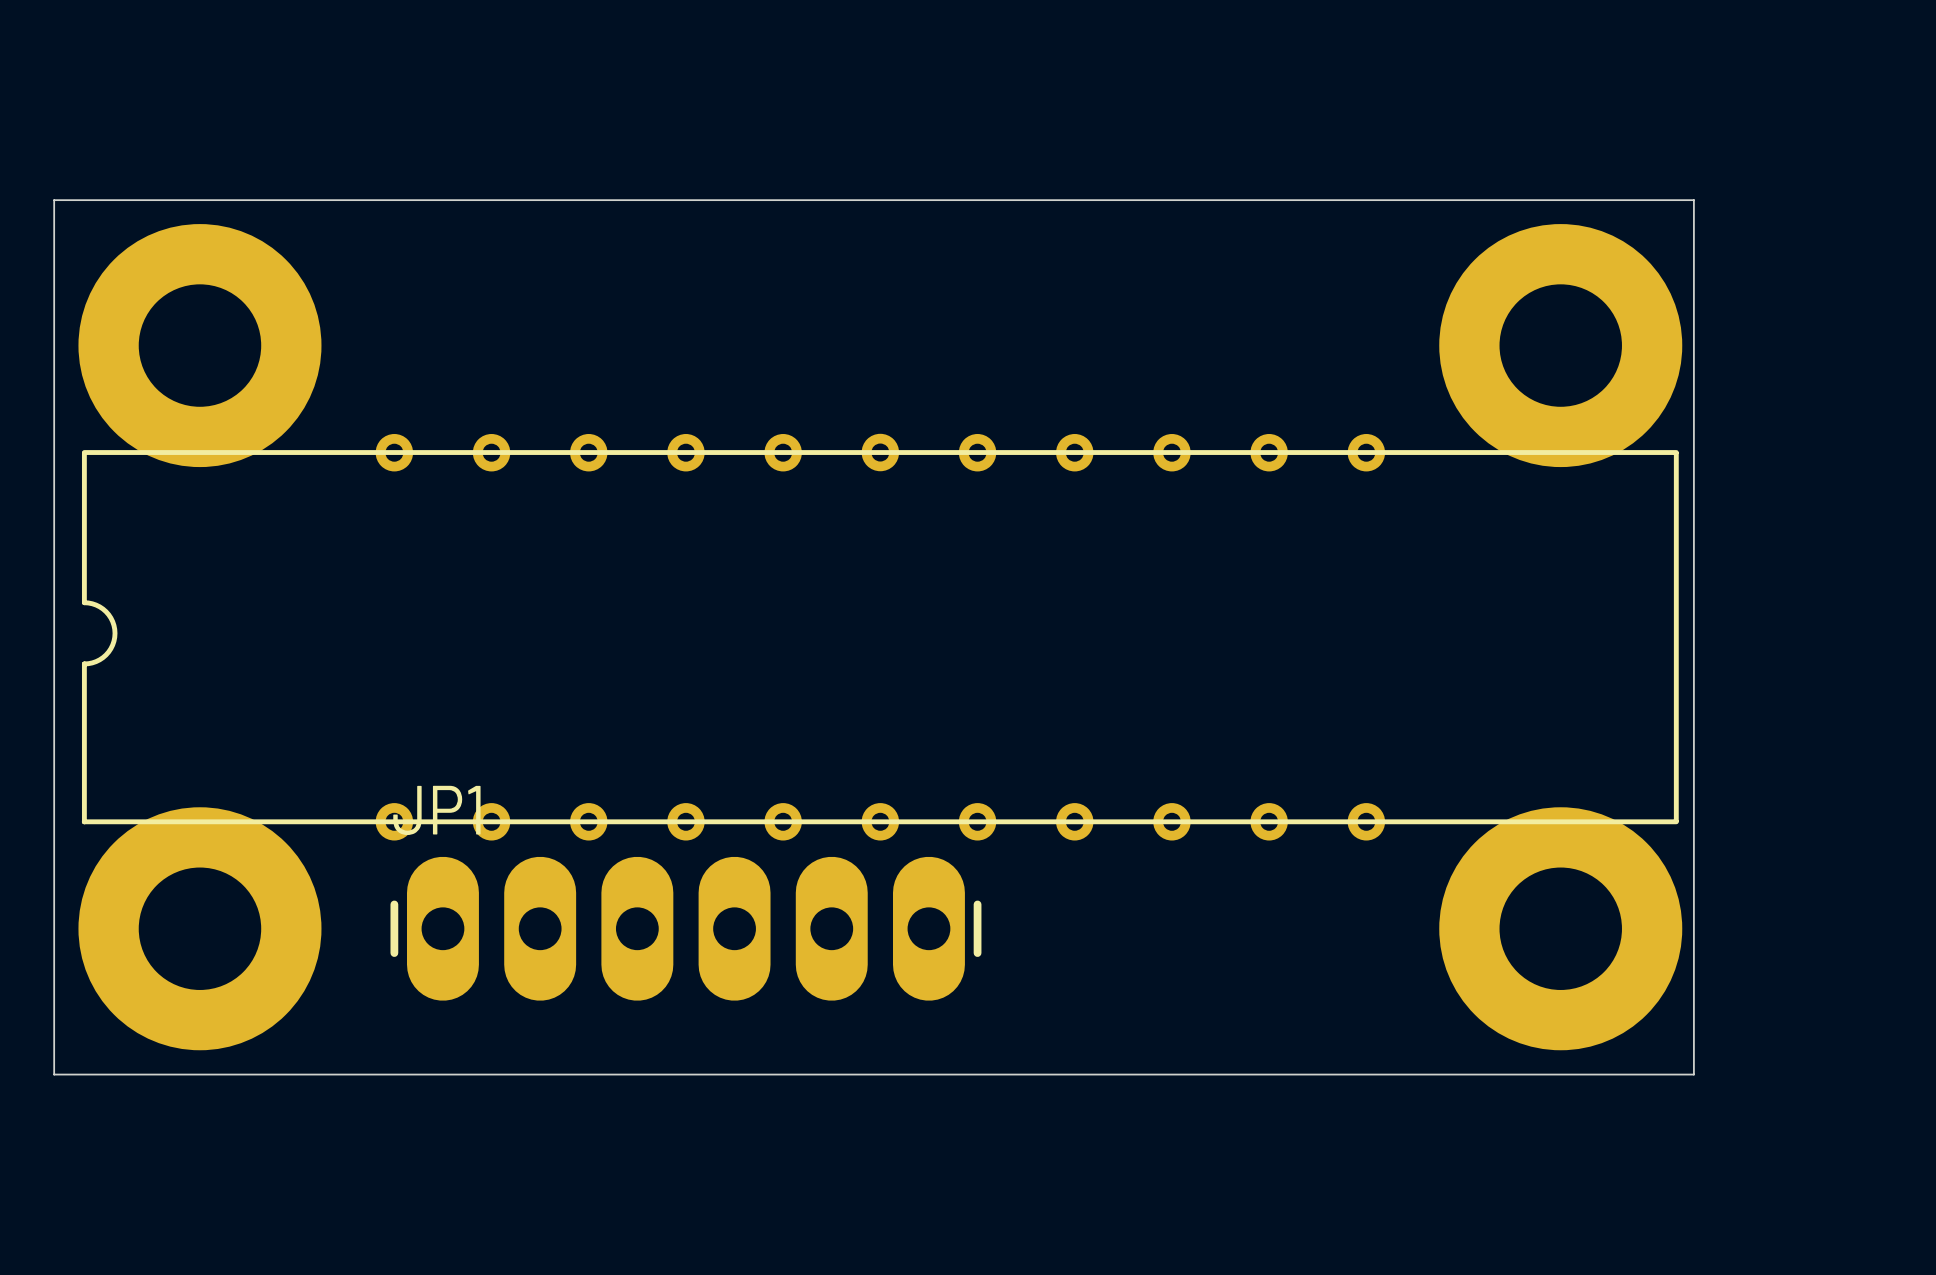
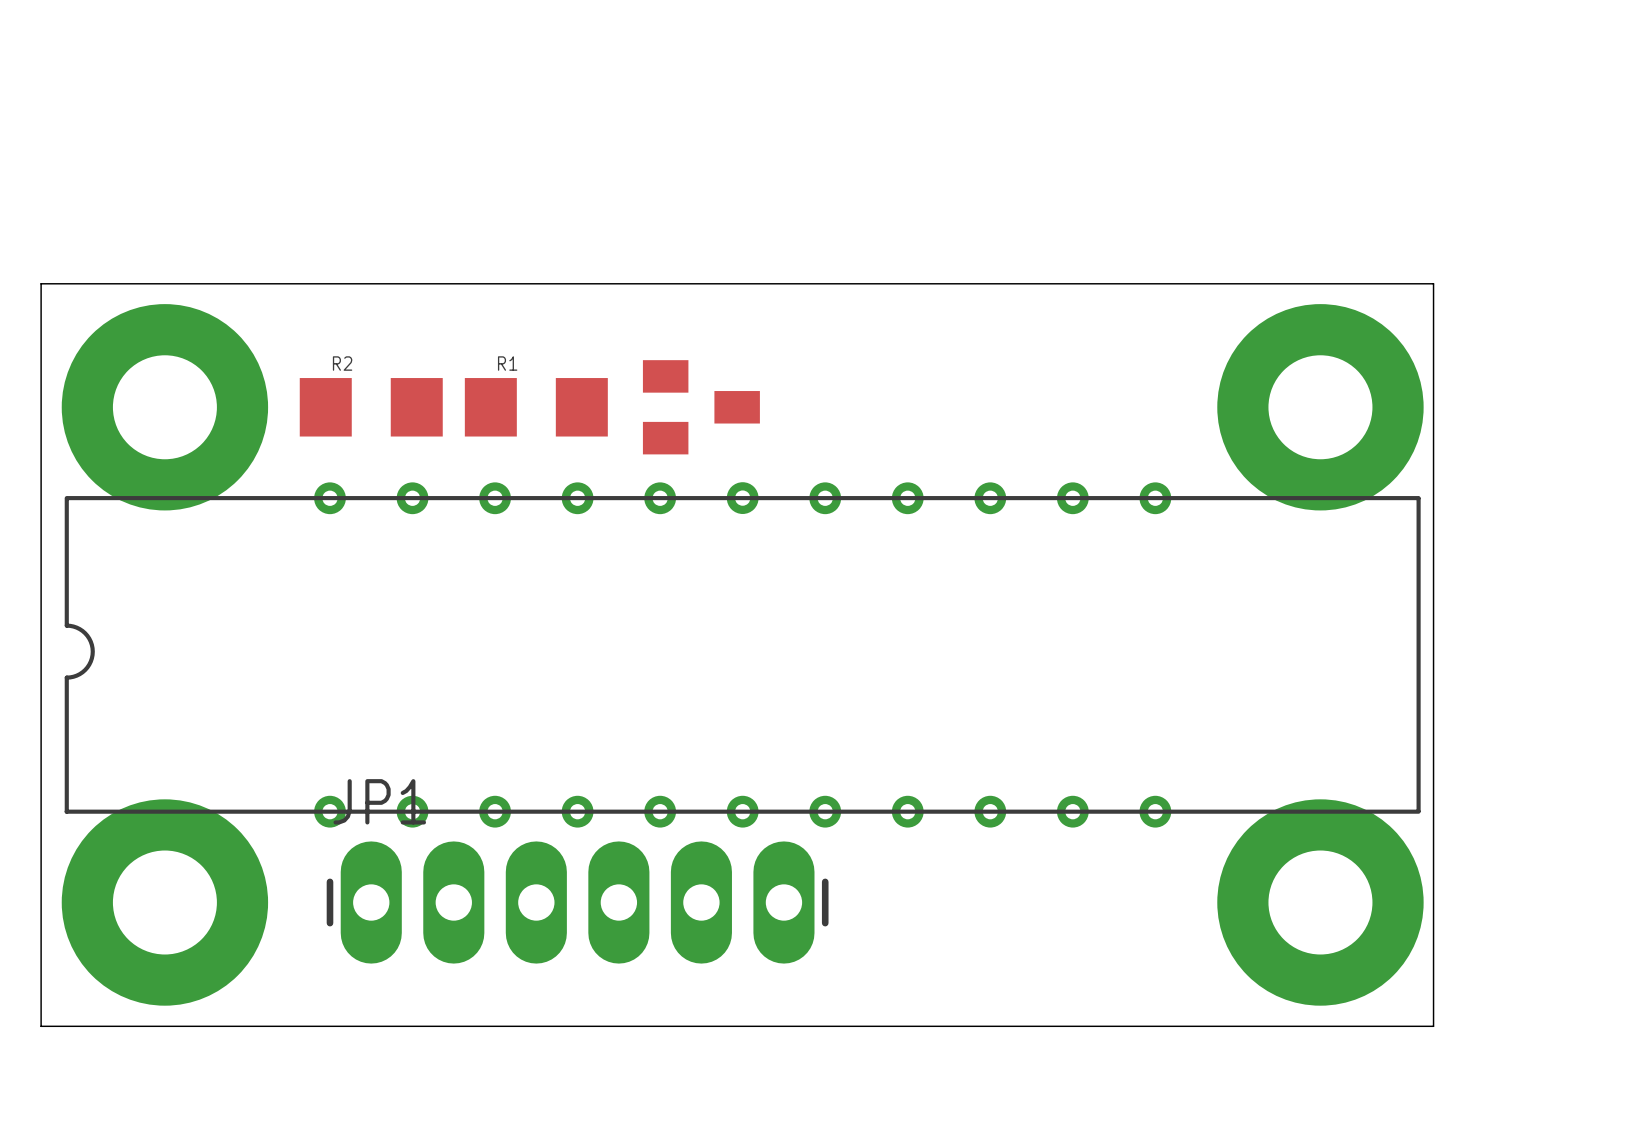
R2: none -> (371, 407)
R1: none -> (536, 407)
part: none -> (701, 407)

